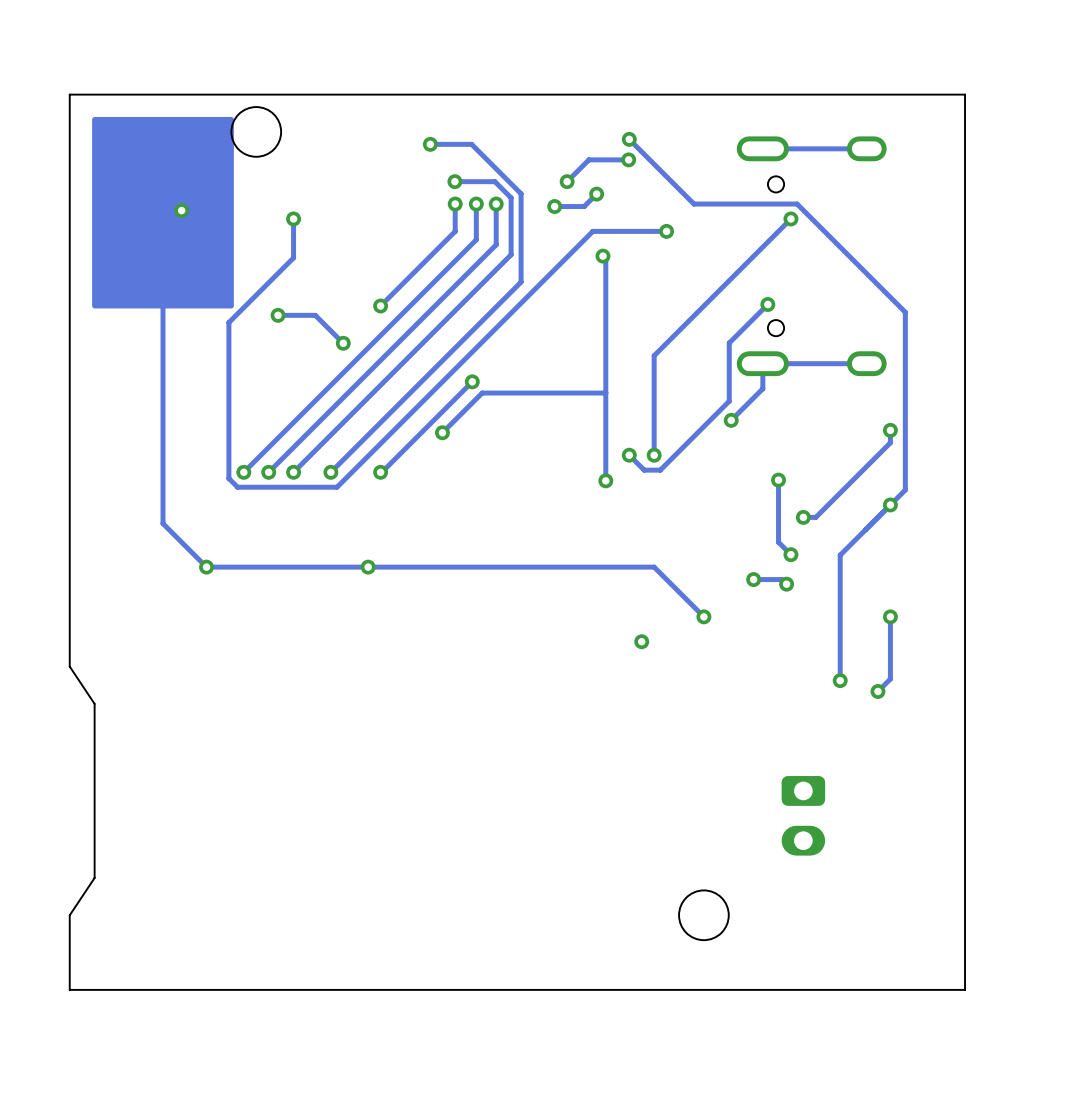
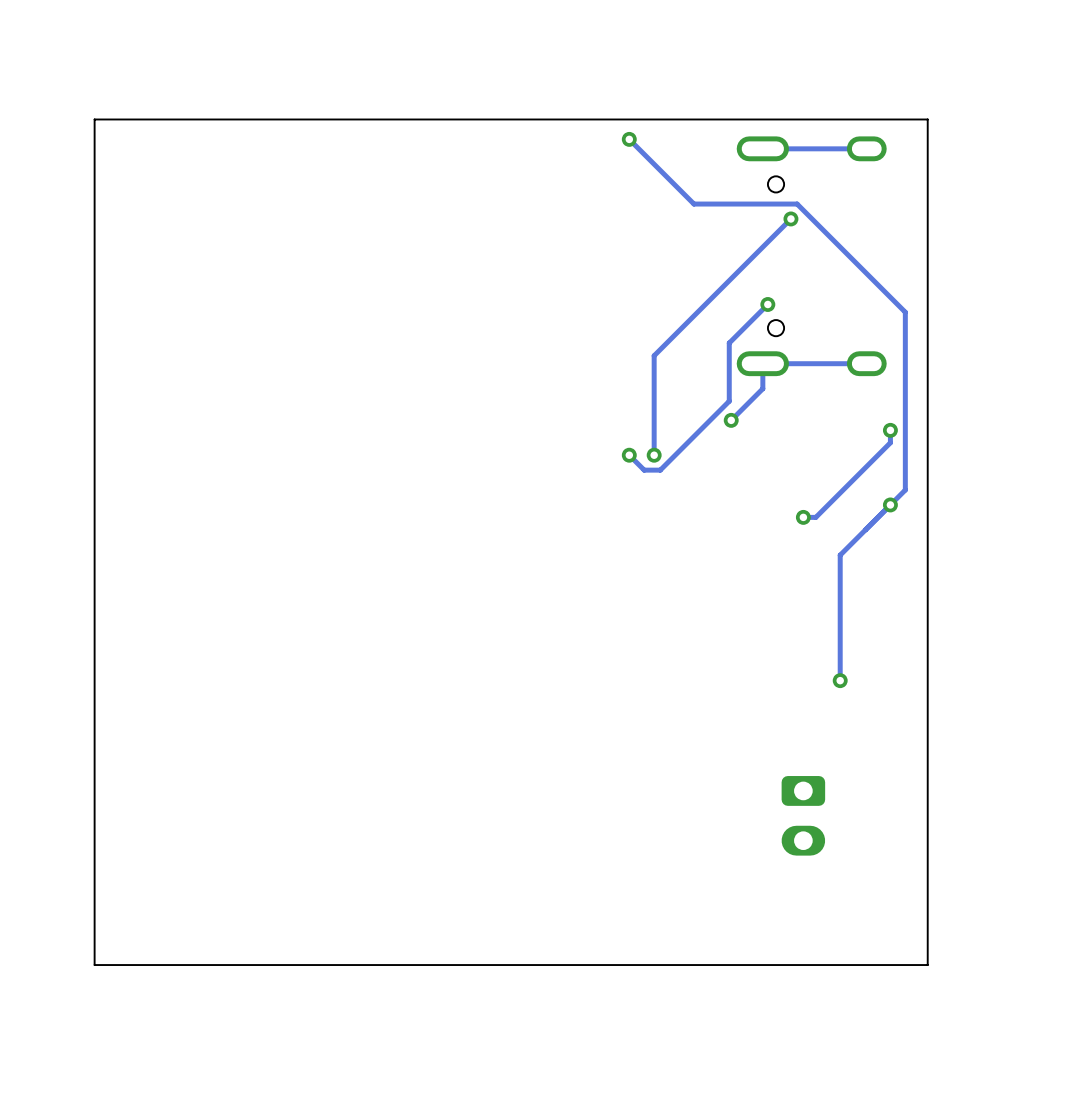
round board edge: [230, 106, 282, 158] -> none
drawing: [92, 117, 234, 309] -> none
track: (430, 144) (471, 144) (521, 193) (521, 282) (330, 472) -> none
via: (430, 144) -> none
track: (628, 159) (588, 159) (567, 181) -> none
via: (628, 159) -> none
track: (454, 181) (494, 181) (511, 197) (511, 254) (293, 472) -> none
via: (454, 181) -> none
via: (567, 181) -> none
track: (596, 194) (584, 206) (554, 206) -> none
via: (596, 194) -> none
track: (455, 204) (455, 231) (380, 306) -> none
via: (455, 204) -> none
track: (476, 204) (476, 239) (243, 472) -> none
via: (476, 204) -> none
track: (496, 204) (496, 244) (268, 472) -> none
via: (496, 204) -> none
via: (554, 206) -> none
via: (181, 210) -> none
track: (163, 212) (163, 523) (206, 567) (654, 567) (703, 616) -> none
track: (293, 218) (293, 257) (228, 322) (228, 478) (237, 487) (337, 487) (592, 231) (666, 231) -> none
via: (293, 218) -> none
via: (666, 231) -> none
track: (602, 256) (605, 258) (605, 480) -> none
via: (602, 256) -> none
via: (380, 306) -> none
track: (278, 315) (315, 315) (343, 343) -> none
via: (278, 315) -> none
via: (343, 343) -> none
track: (472, 381) (380, 472) -> none
via: (472, 381) -> none
track: (605, 393) (482, 393) (442, 432) -> none
via: (442, 432) -> none
via: (243, 472) -> none
via: (268, 472) -> none
via: (293, 472) -> none
via: (330, 472) -> none
via: (380, 472) -> none
via: (605, 480) -> none
track: (778, 480) (778, 542) (790, 554) -> none
via: (778, 480) -> none
via: (790, 554) -> none
via: (206, 567) -> none
via: (368, 567) -> none
track: (753, 579) (781, 579) (786, 584) -> none
via: (753, 579) -> none
via: (786, 584) -> none
via: (703, 616) -> none
track: (890, 616) (890, 679) (877, 691) -> none
via: (890, 616) -> none
via: (641, 641) -> none
via: (877, 691) -> none
board edge: (94, 703) (69, 666) (69, 94) (965, 94) (965, 989) (69, 989) (69, 915) (94, 877) -> (94, 703) (94, 119) (927, 119) (927, 965) (94, 965) (94, 877)
round board edge: [678, 889, 730, 941] -> none

